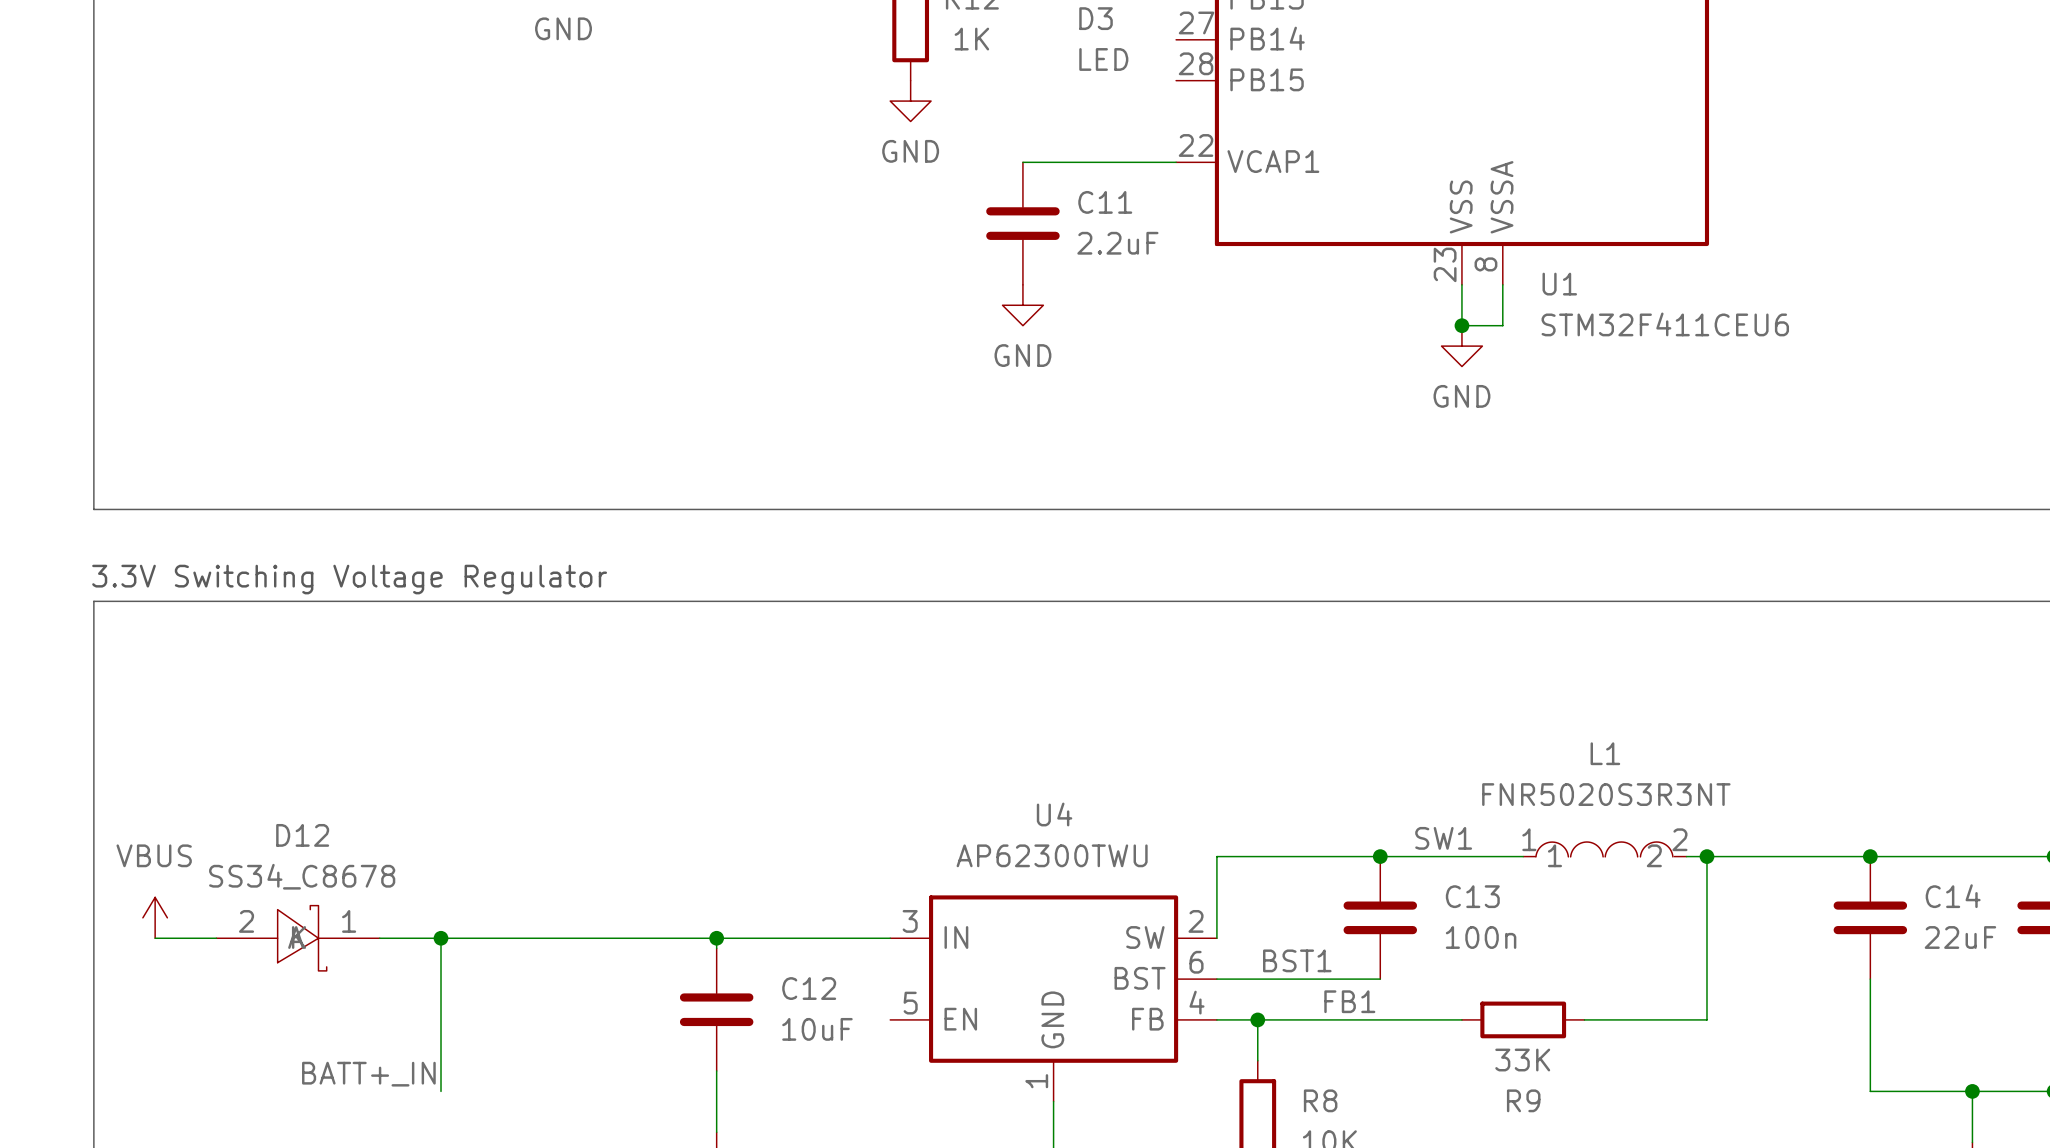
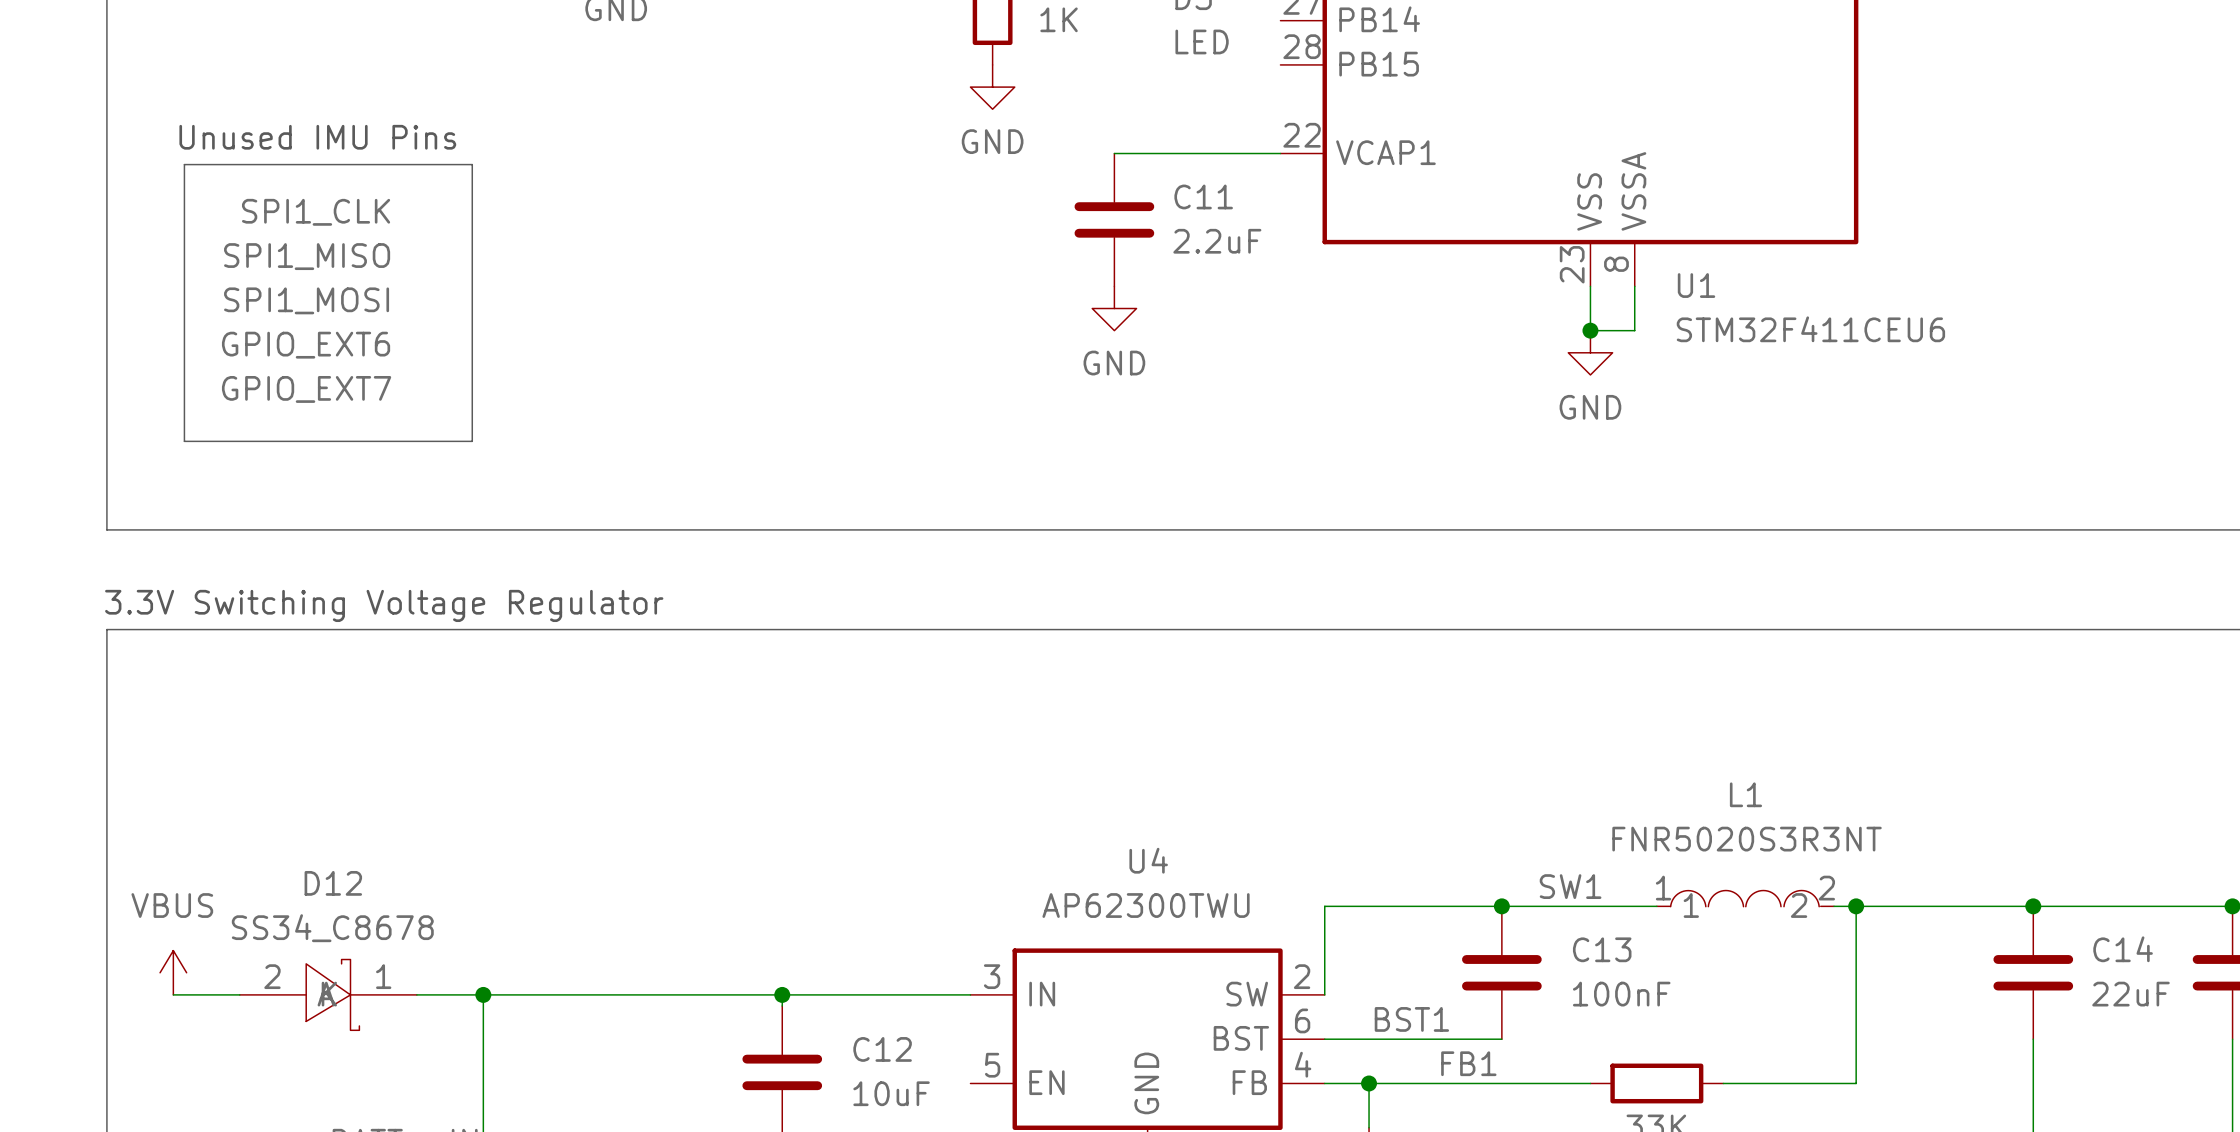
text: none -> Unused IMU Pins (317, 137)
line: none -> (184, 164) (472, 164) (472, 441) (184, 441) (184, 164)
label: none -> SPI1_CLK (316, 212)
label: none -> SPI1_MISO (307, 256)
label: none -> SPI1_MOSI (306, 300)
label: none -> GPIO_EXT6 (306, 345)
label: none -> GPIO_EXT7 (306, 389)
C13 value: 100n (1481, 937) -> 100nF (1621, 994)

